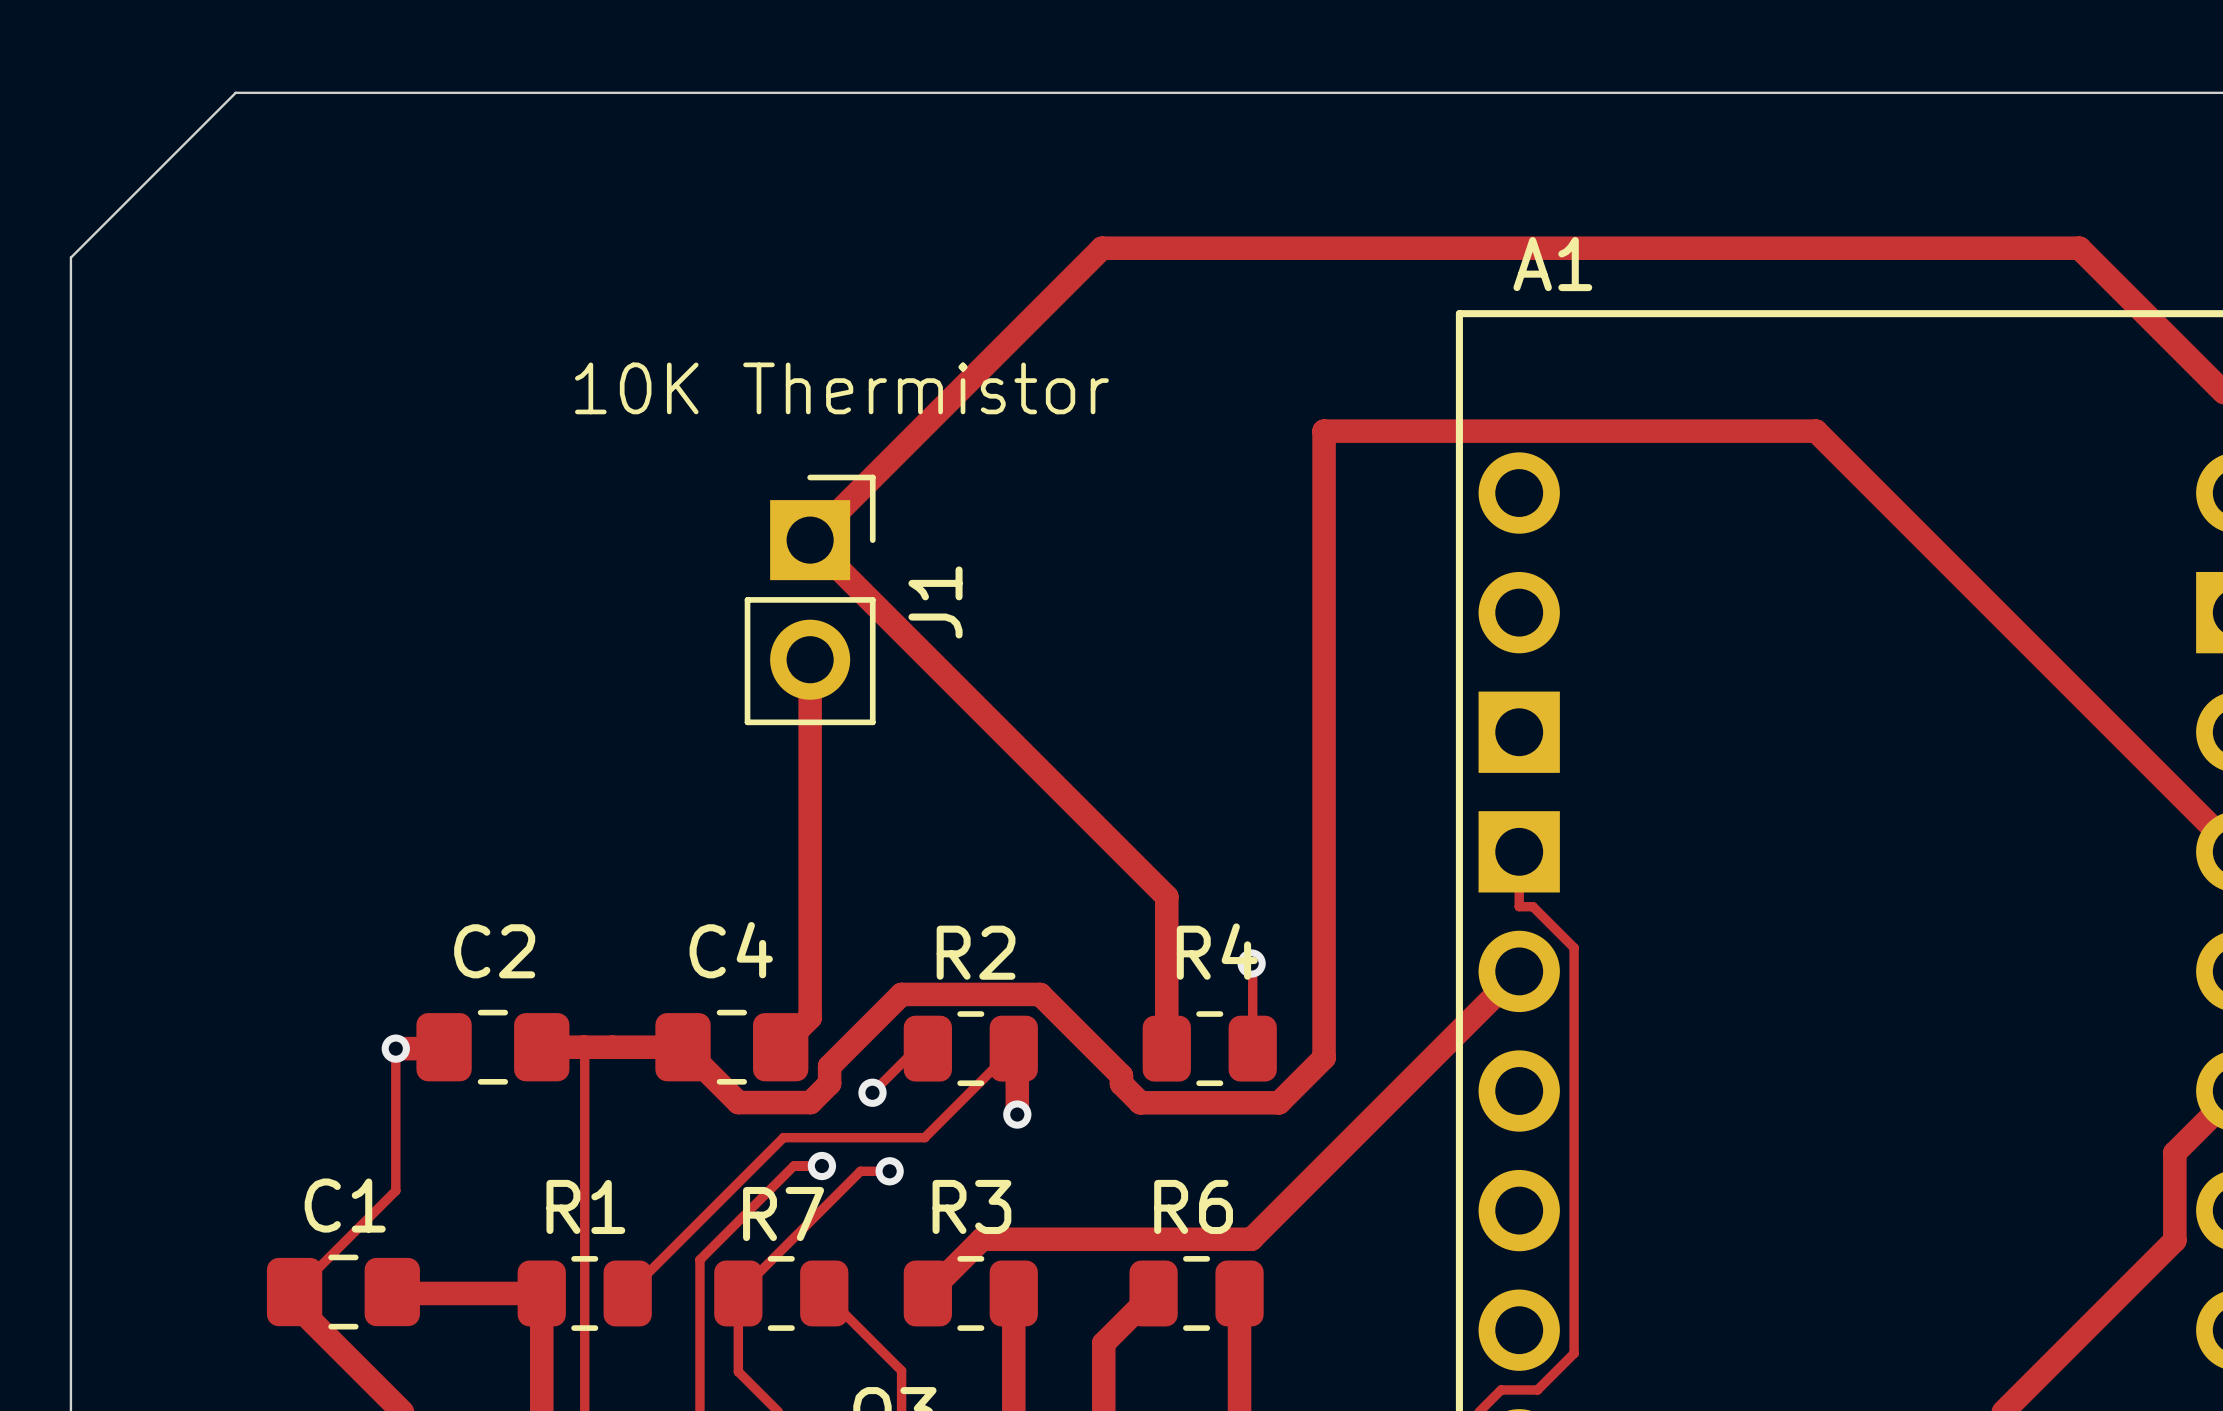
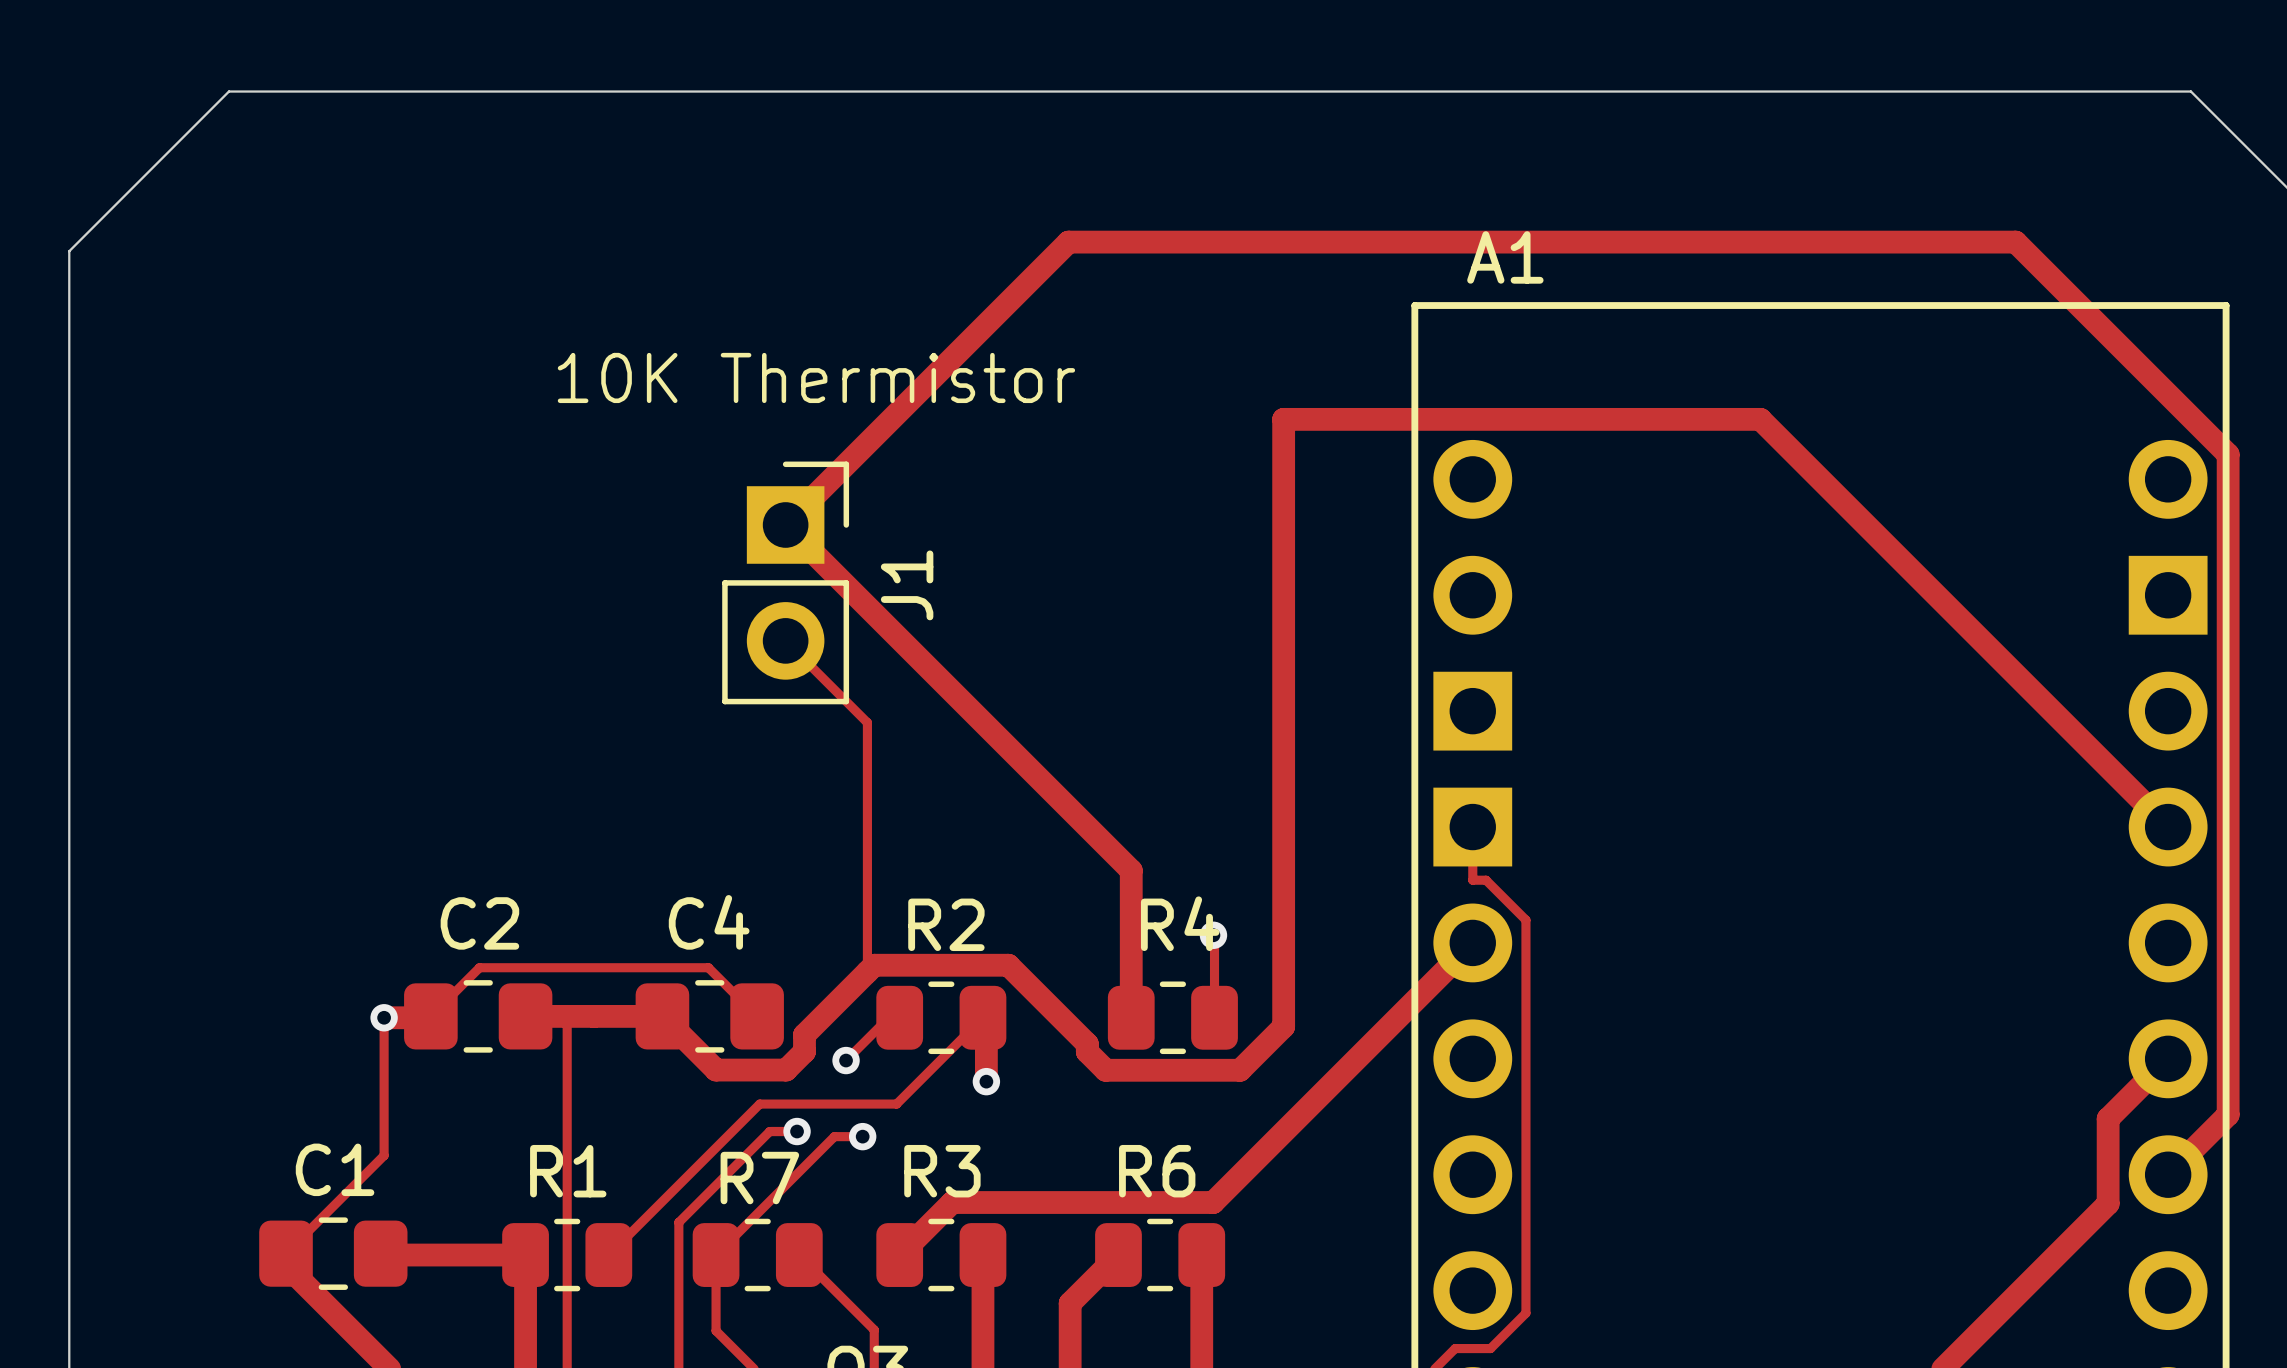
track: (810, 659) (810, 1017) (780, 1047) -> (785, 640) (867, 722) (867, 971)
track: none -> (430, 1016) (479, 967) (708, 967) (757, 1016)

